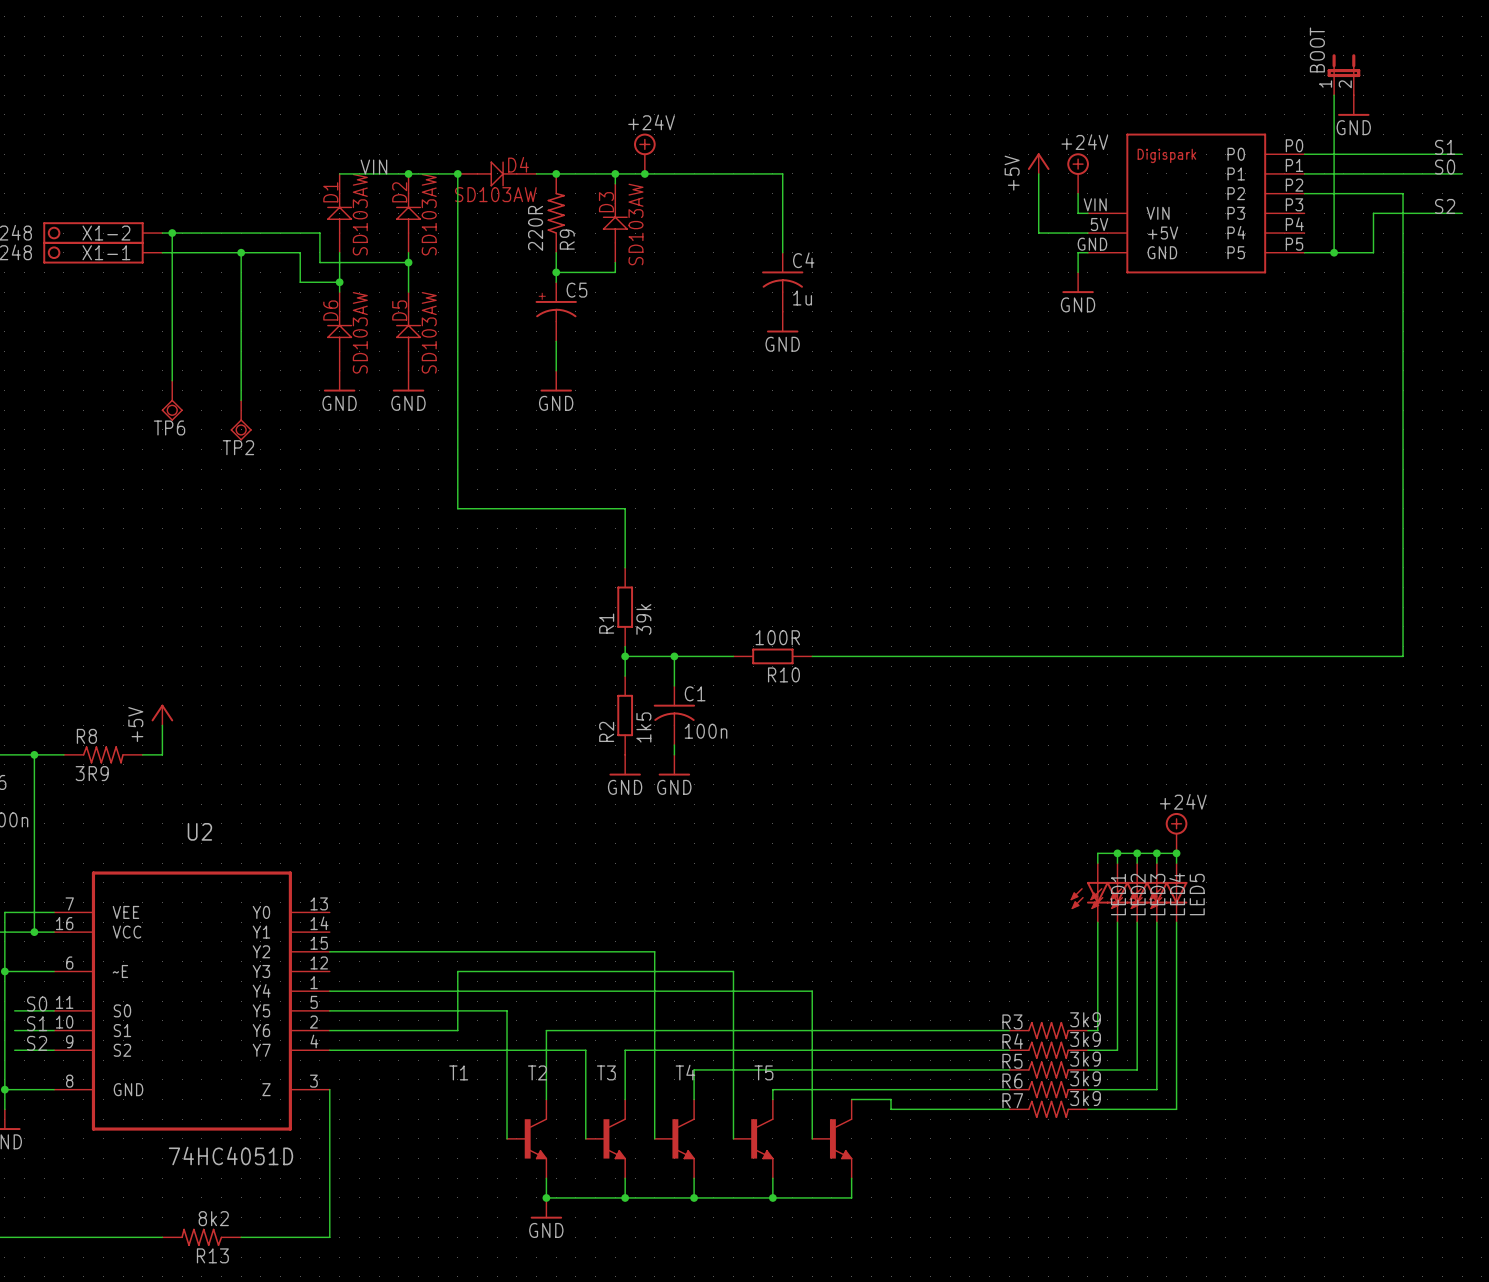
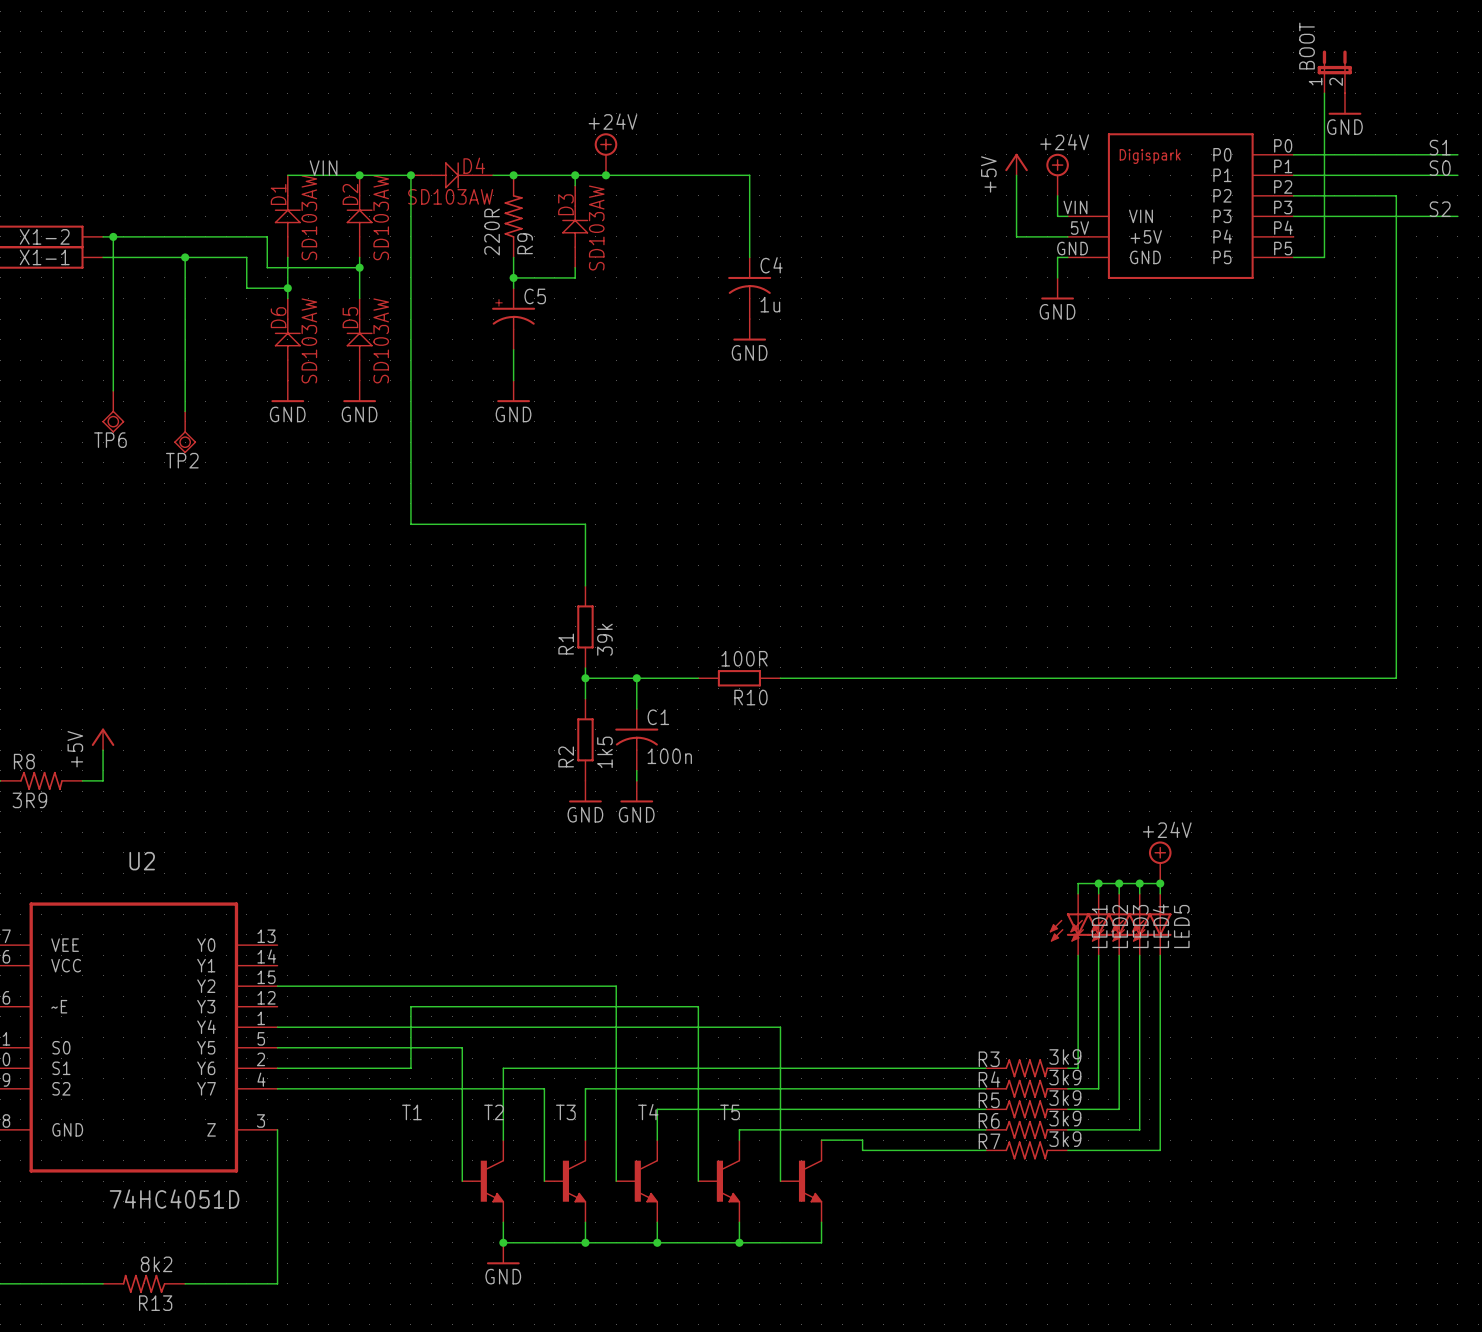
wire: (1373, 213) (1373, 252) (1334, 252) -> (1365, 216) (1293, 216)
junction: (1334, 252) -> none

